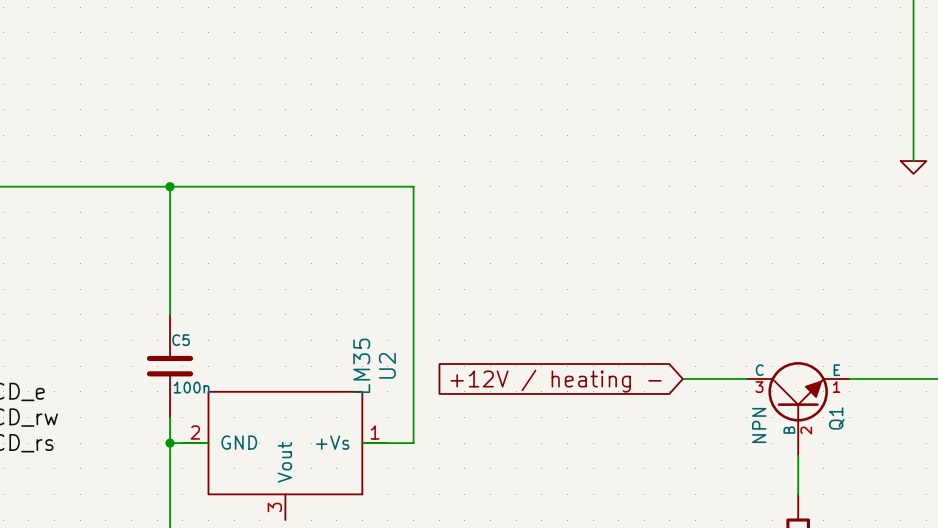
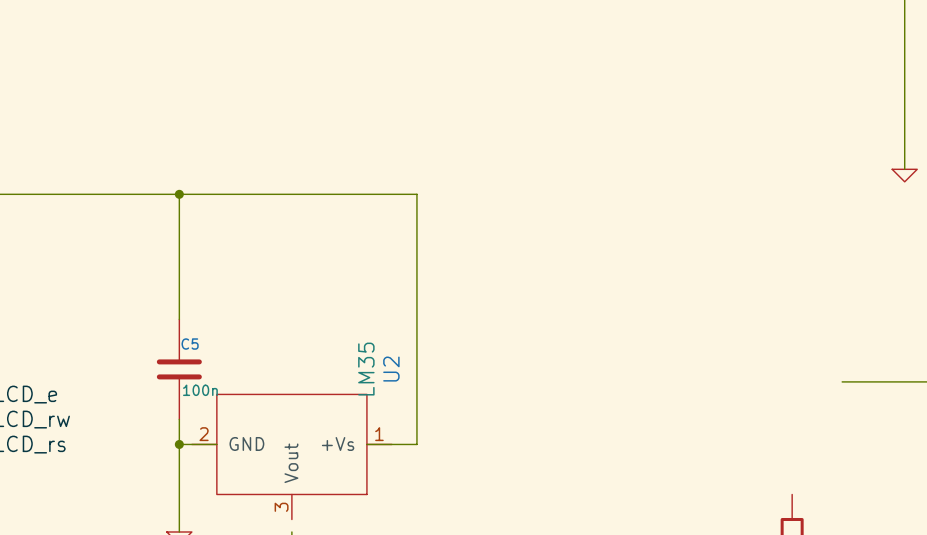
wire: (682, 378) (746, 378) -> none
global label: +12V / heating - (556, 381) -> none
Q1: NPN (798, 408) -> none
wire: (798, 455) (798, 494) -> none

